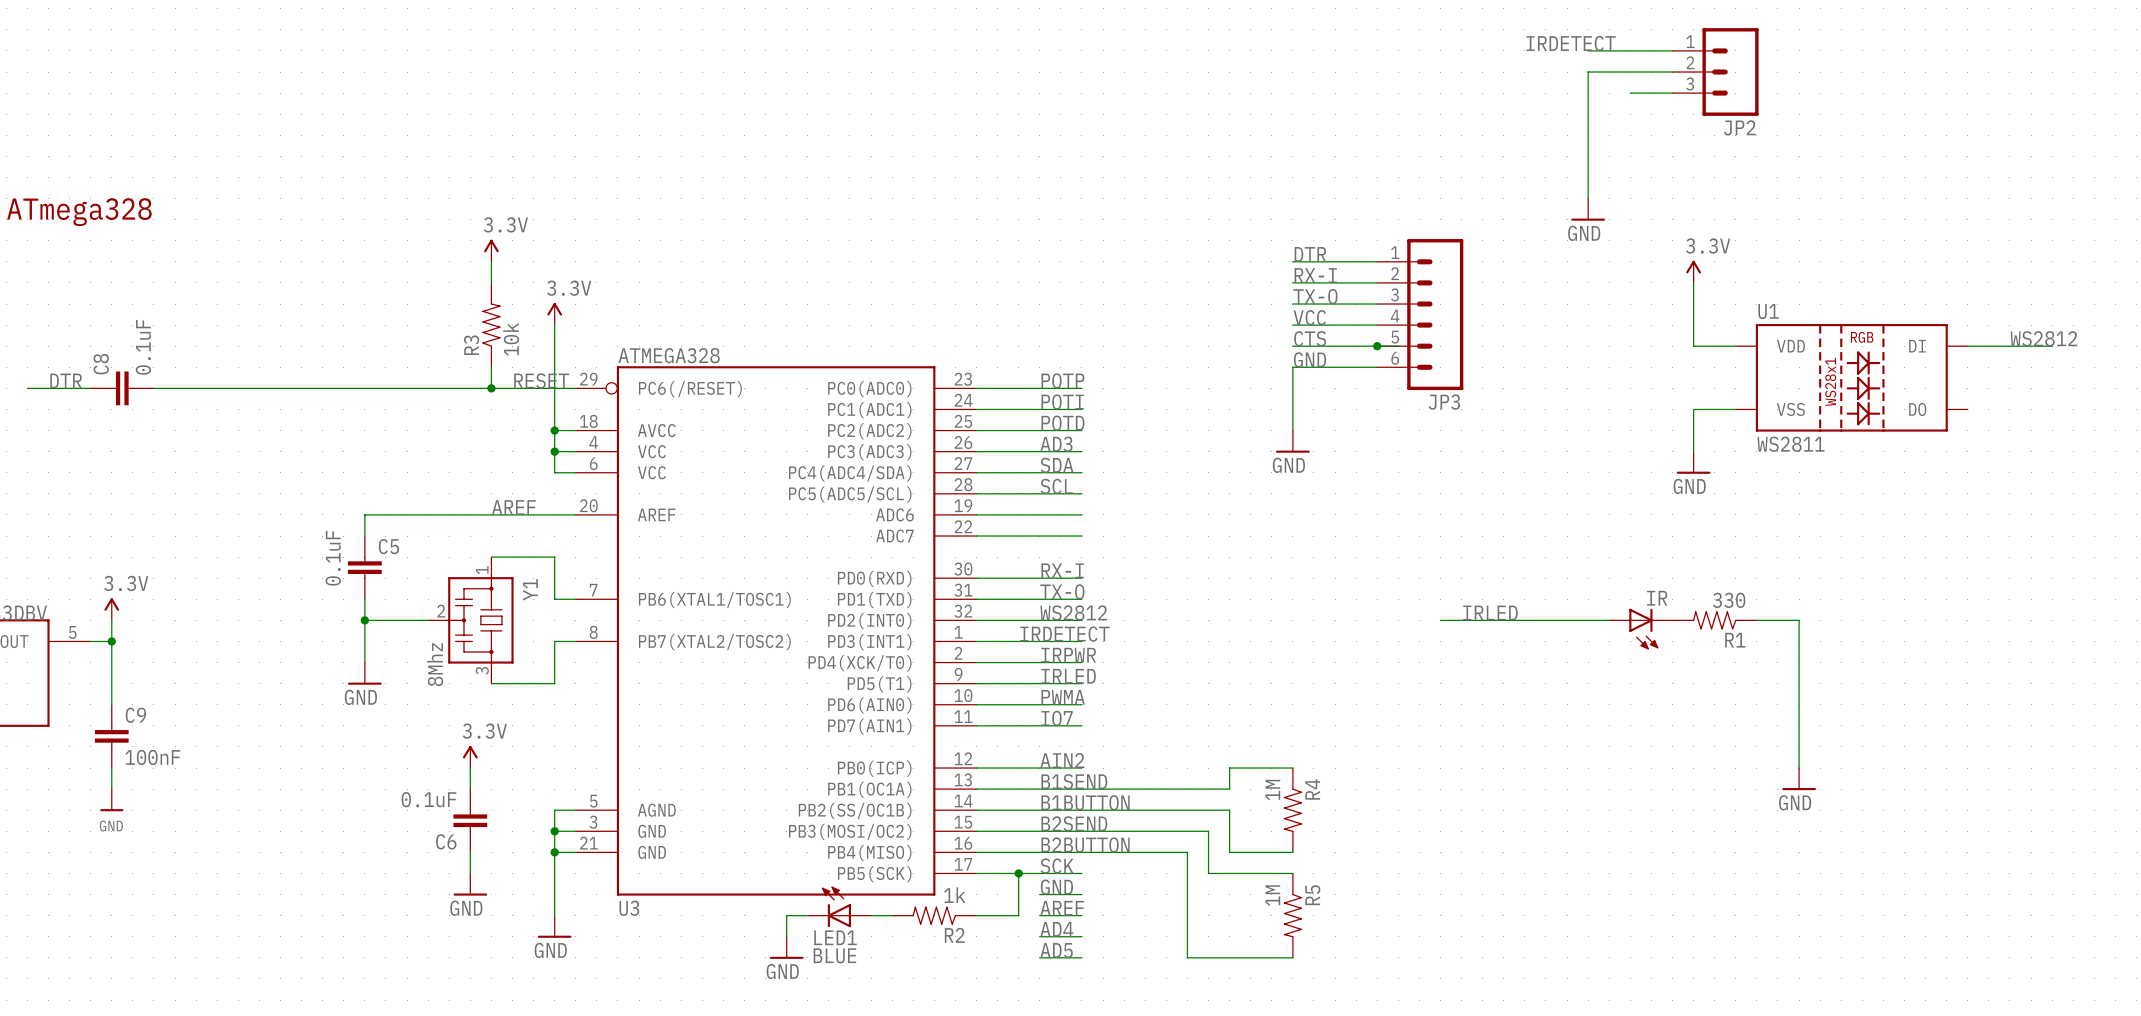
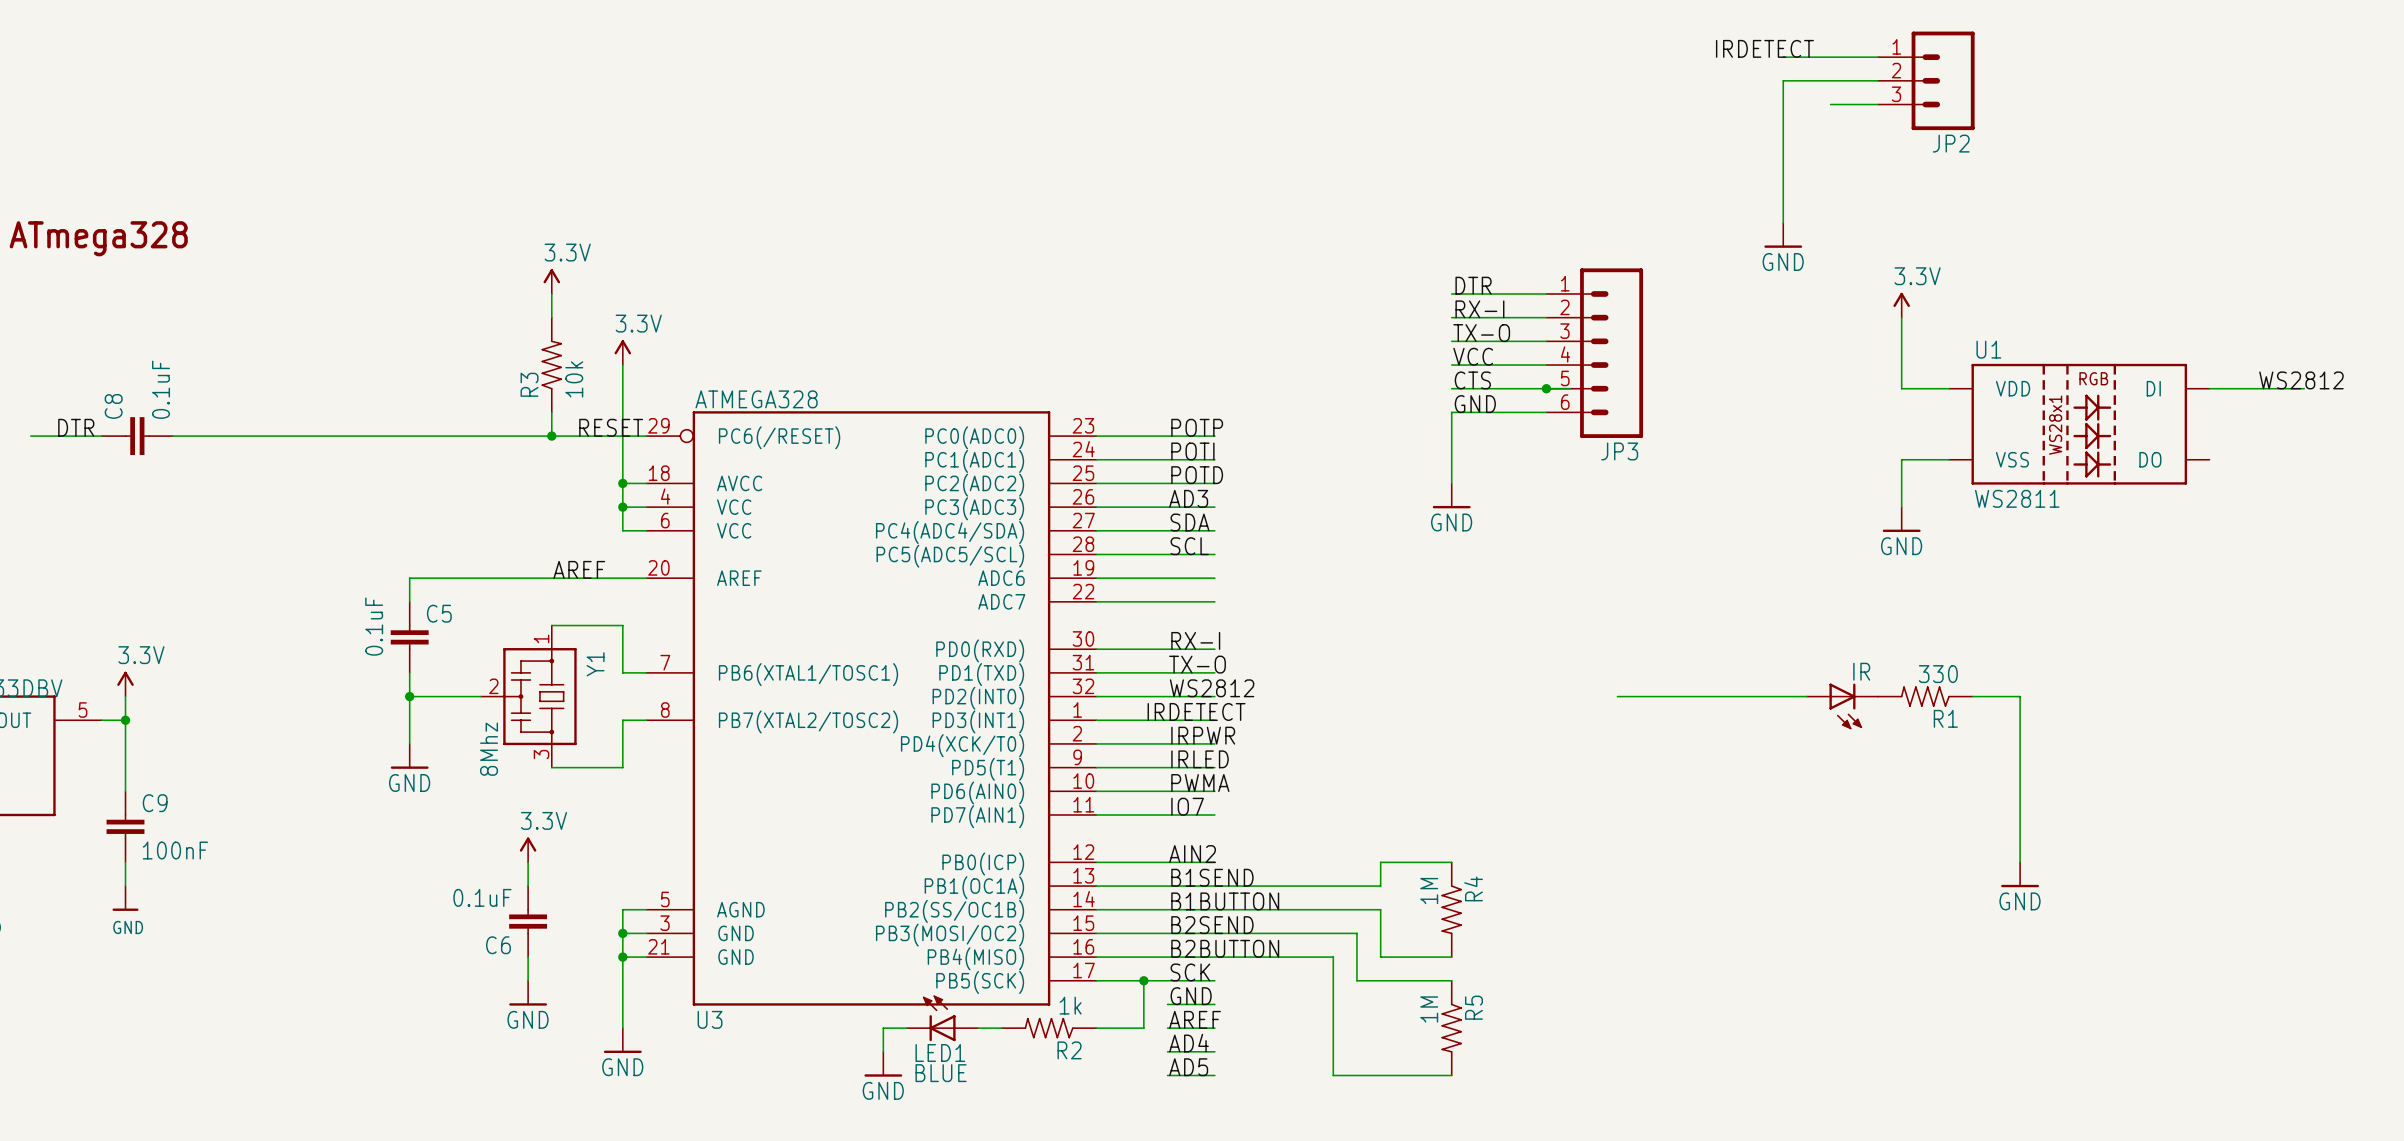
label: IRLED (1490, 612) -> none

